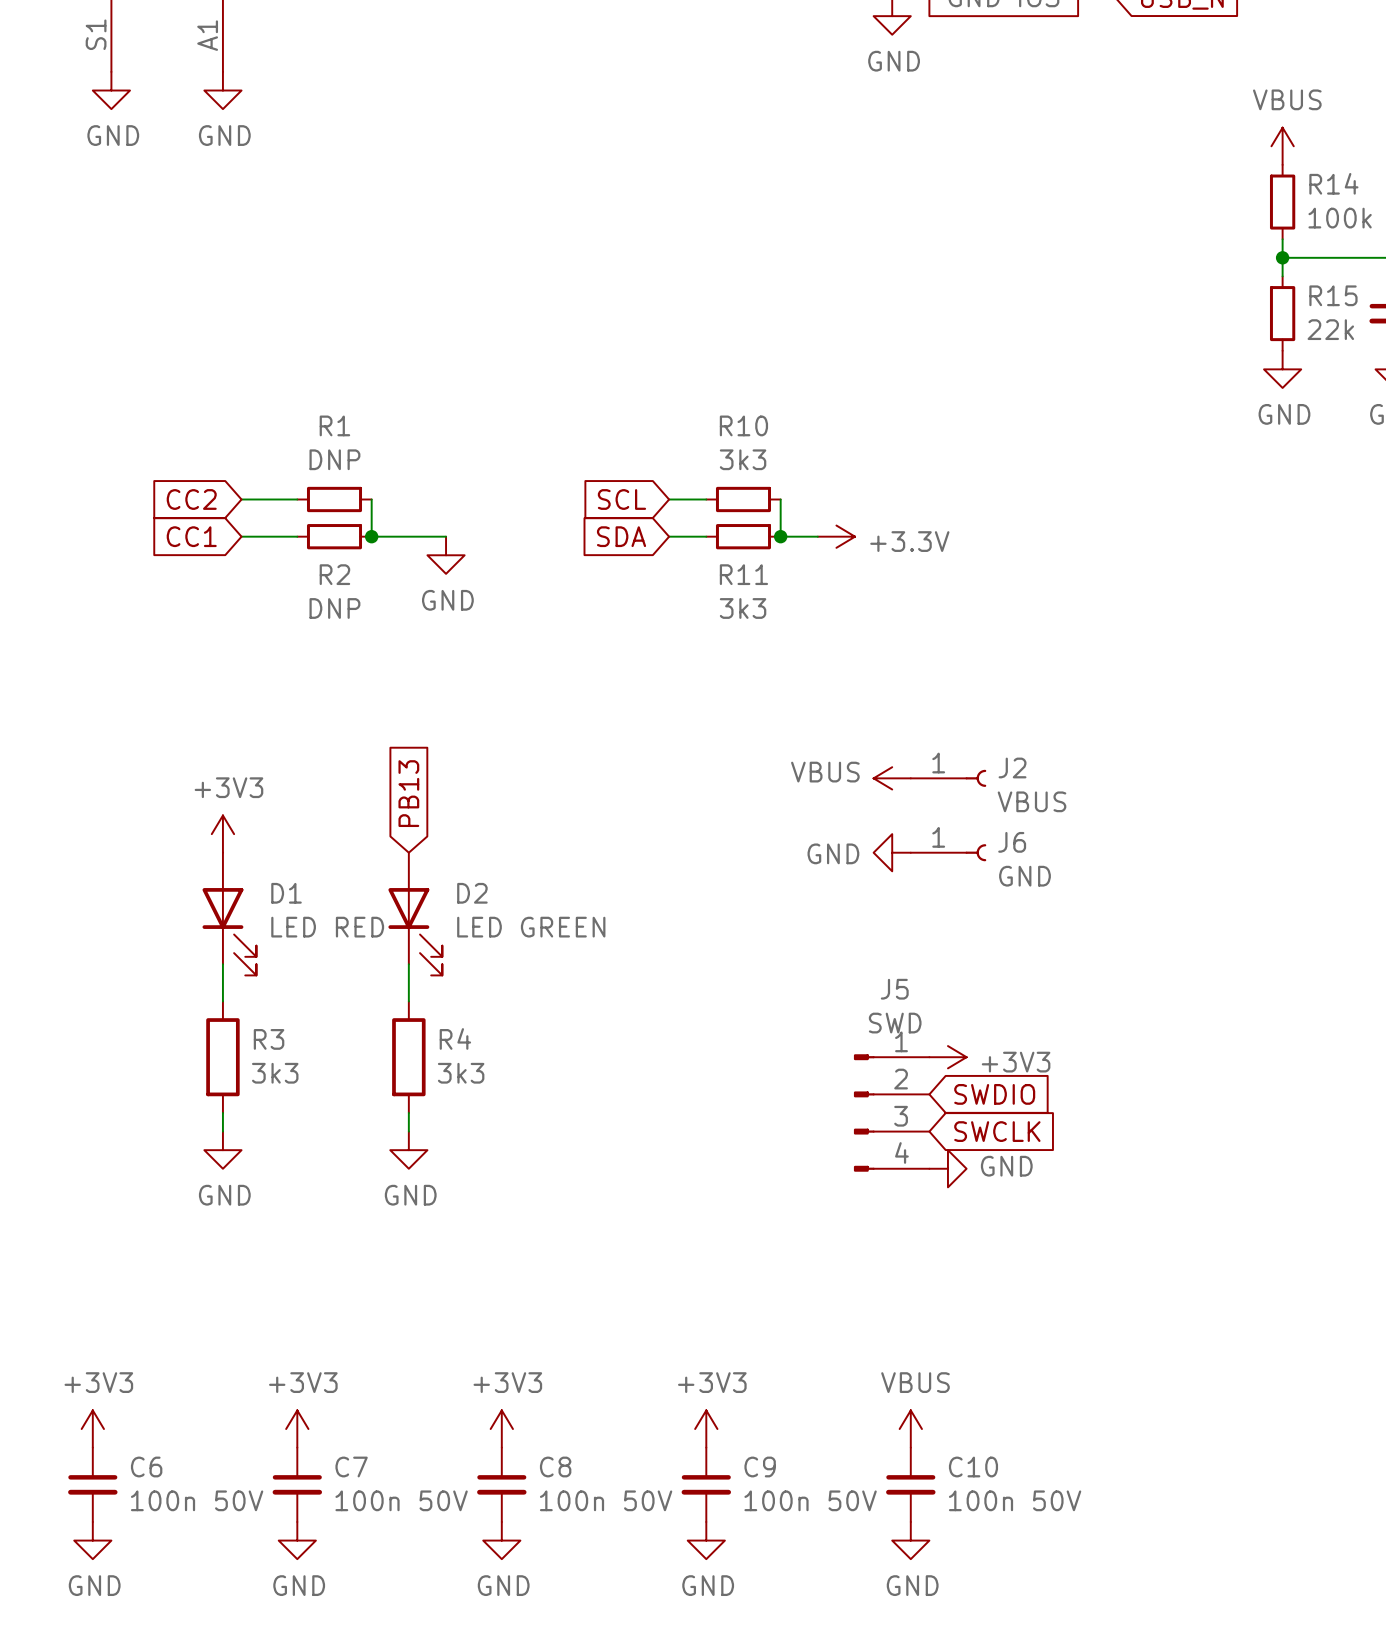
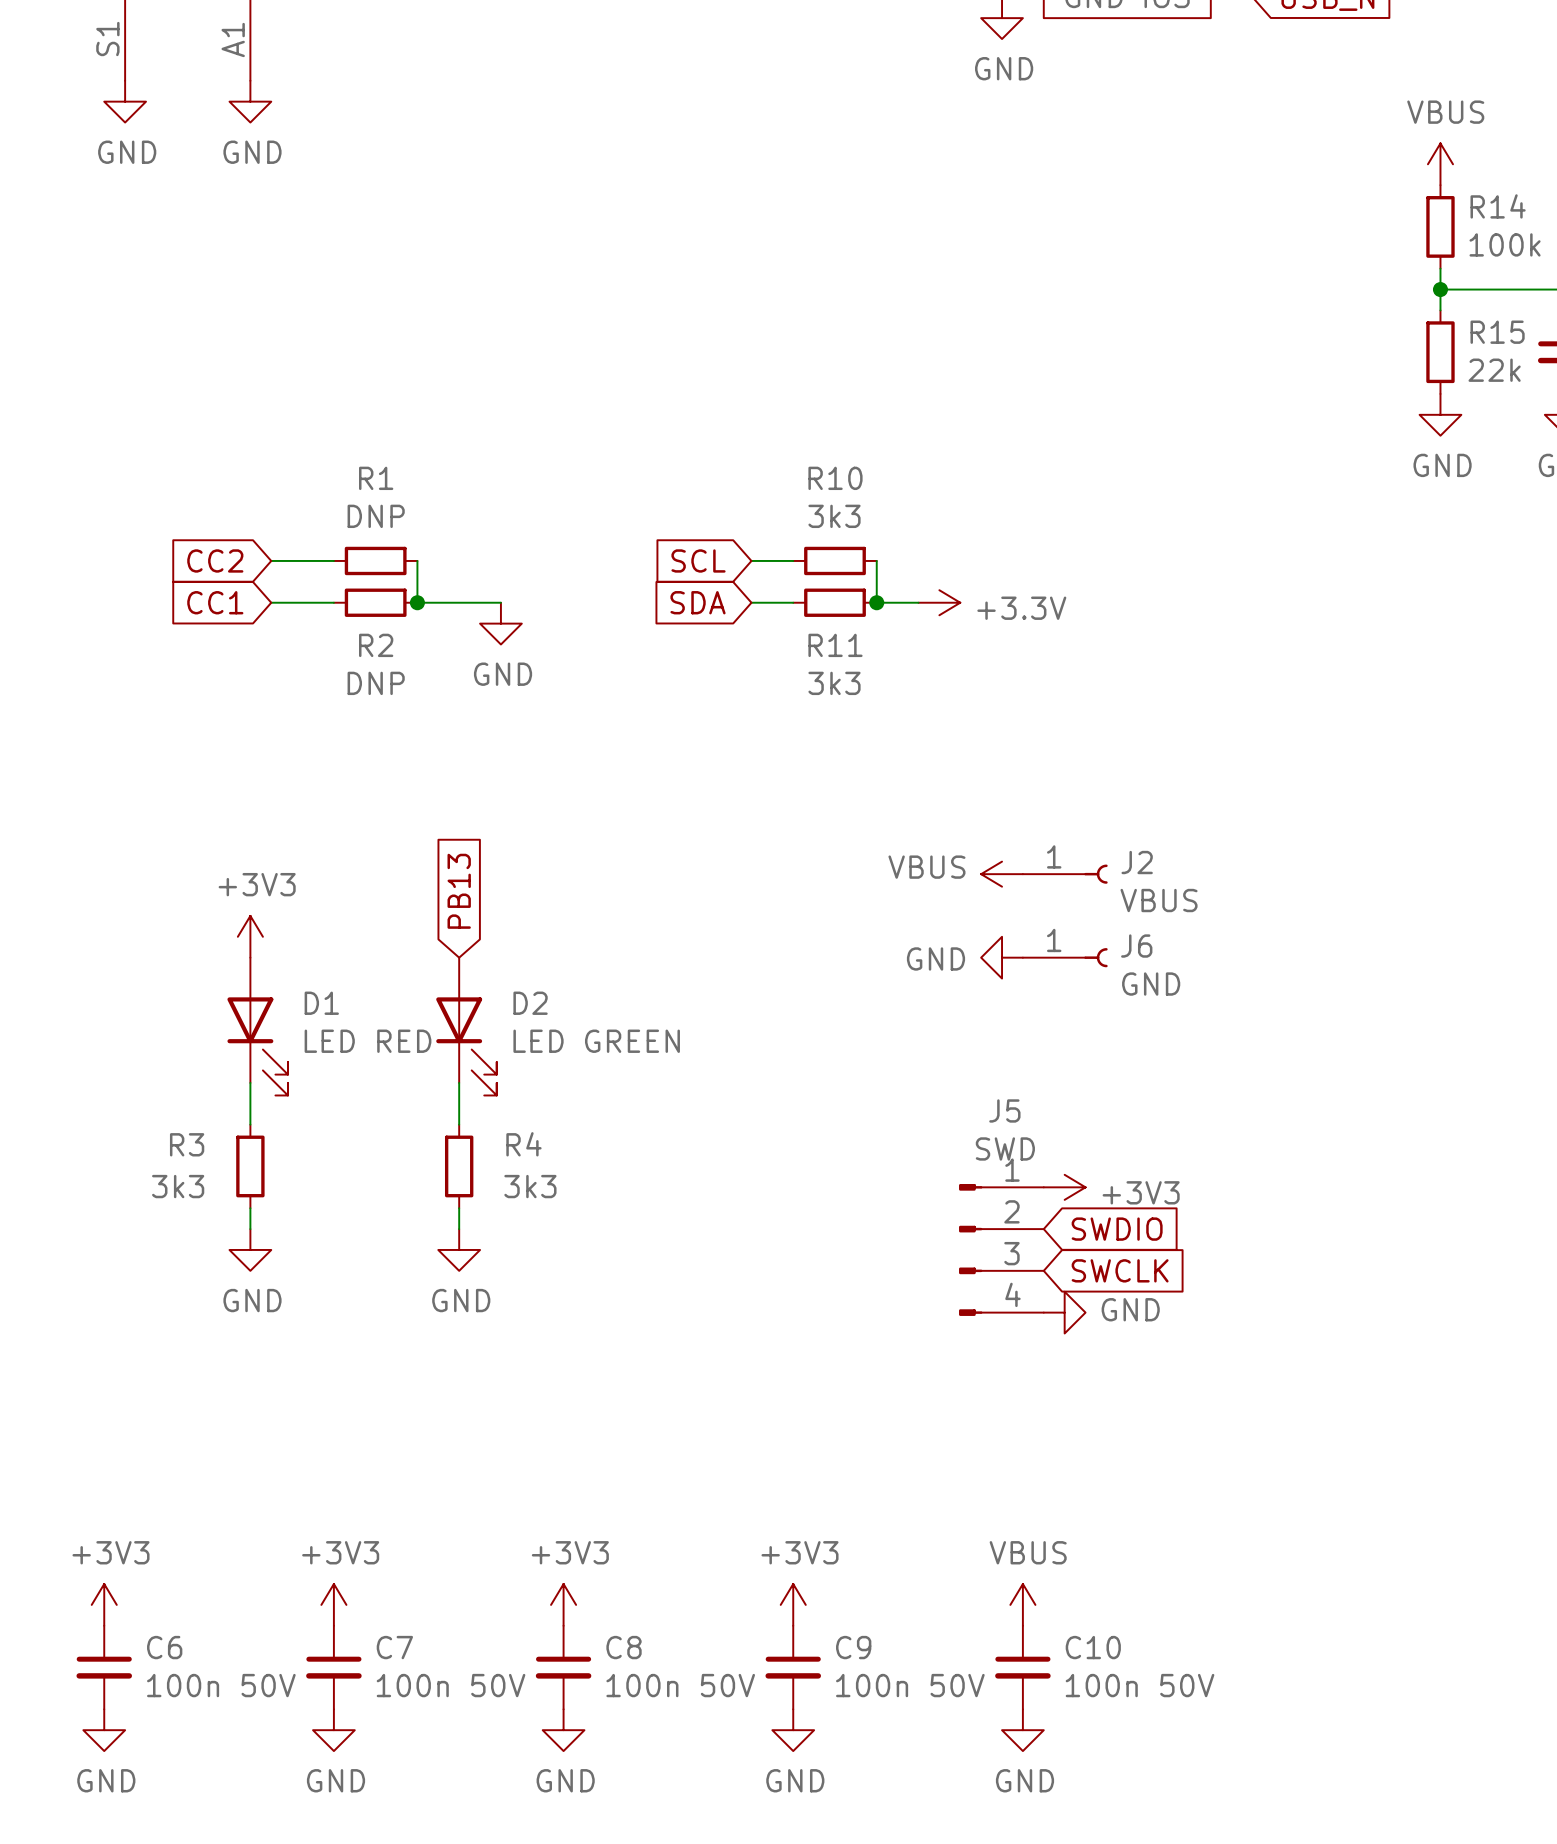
R3 symbol: [206, 1001, 240, 1113] -> [236, 1124, 265, 1209]
R4 symbol: [392, 1001, 426, 1113] -> [444, 1124, 474, 1209]
R3 name position: R3 (269, 1039) -> R3 (187, 1144)
R3 value position: 3k3 (275, 1073) -> 3k3 (178, 1186)
wire: (222, 1112) (222, 1131) -> (250, 1208) (250, 1229)
wire: (408, 1112) (408, 1131) -> (459, 1208) (459, 1229)
power symbol position: GND (222, 1150) -> GND (250, 1249)
power symbol position: GND (408, 1150) -> GND (459, 1249)

